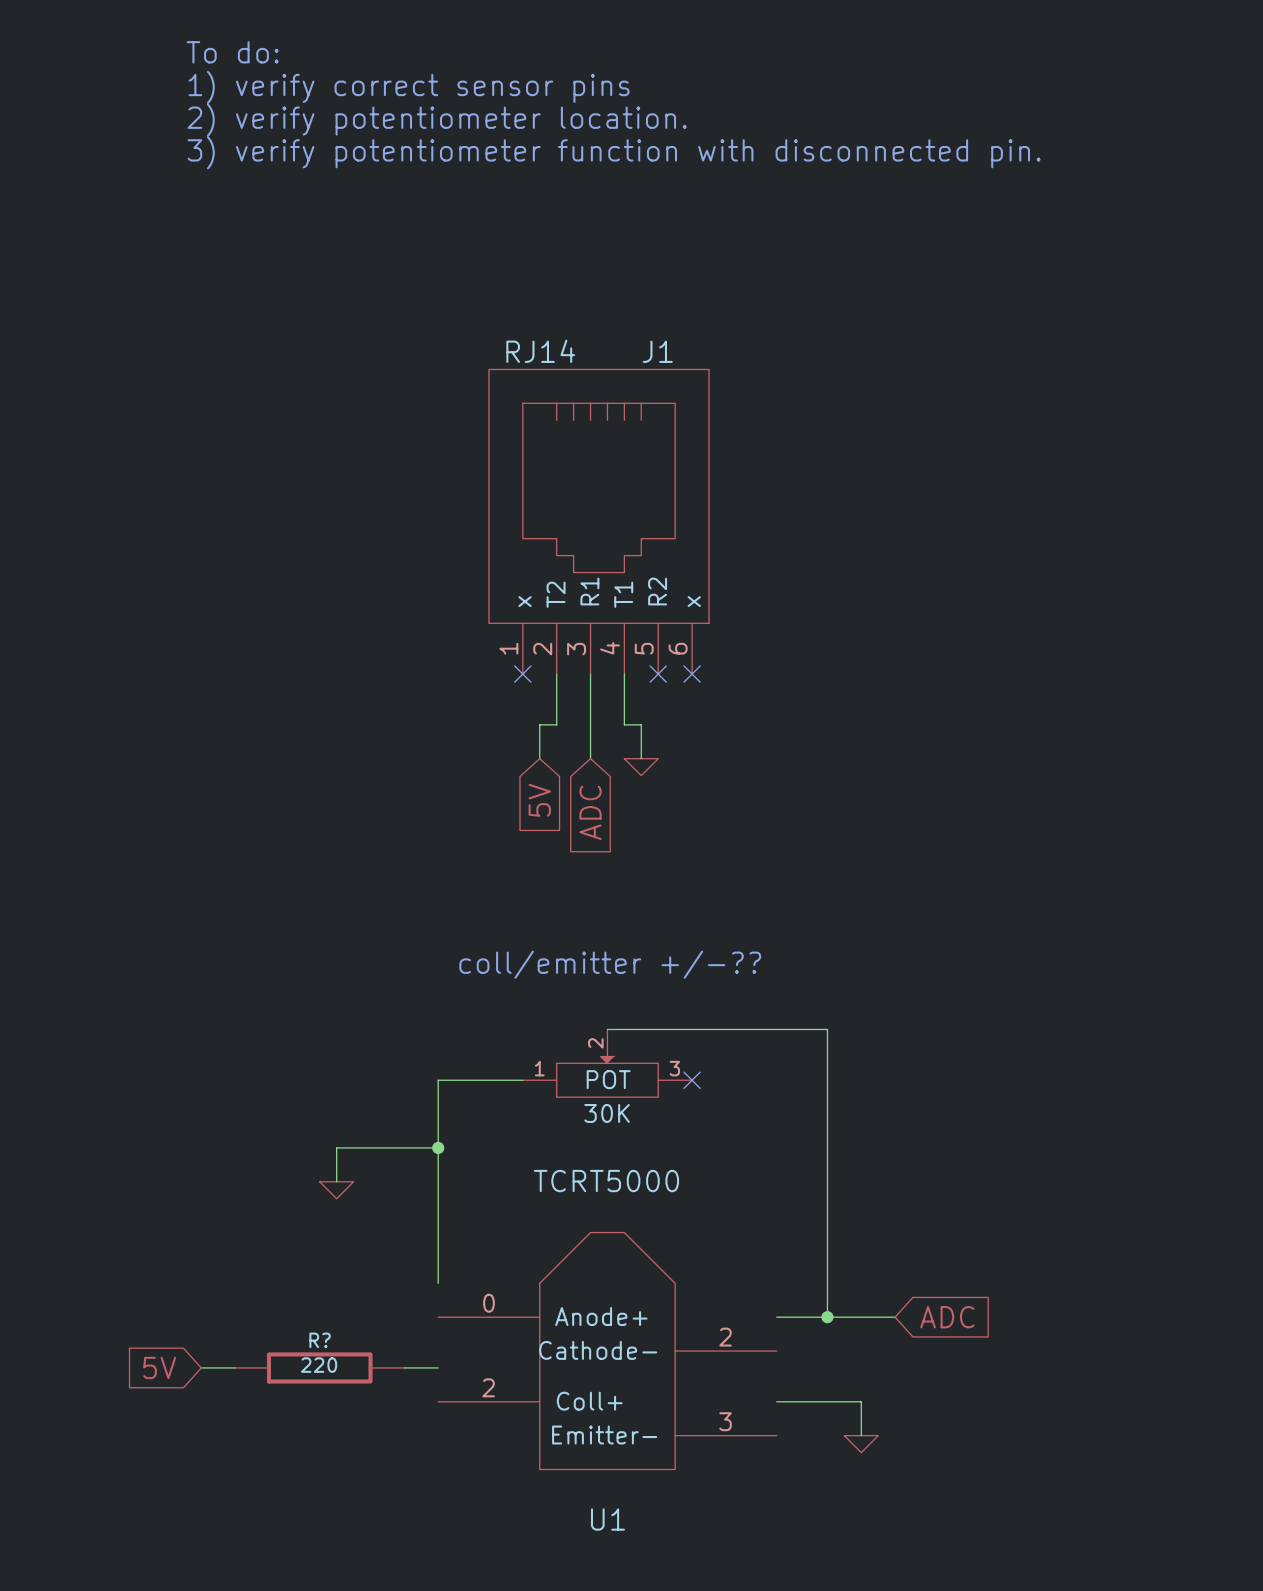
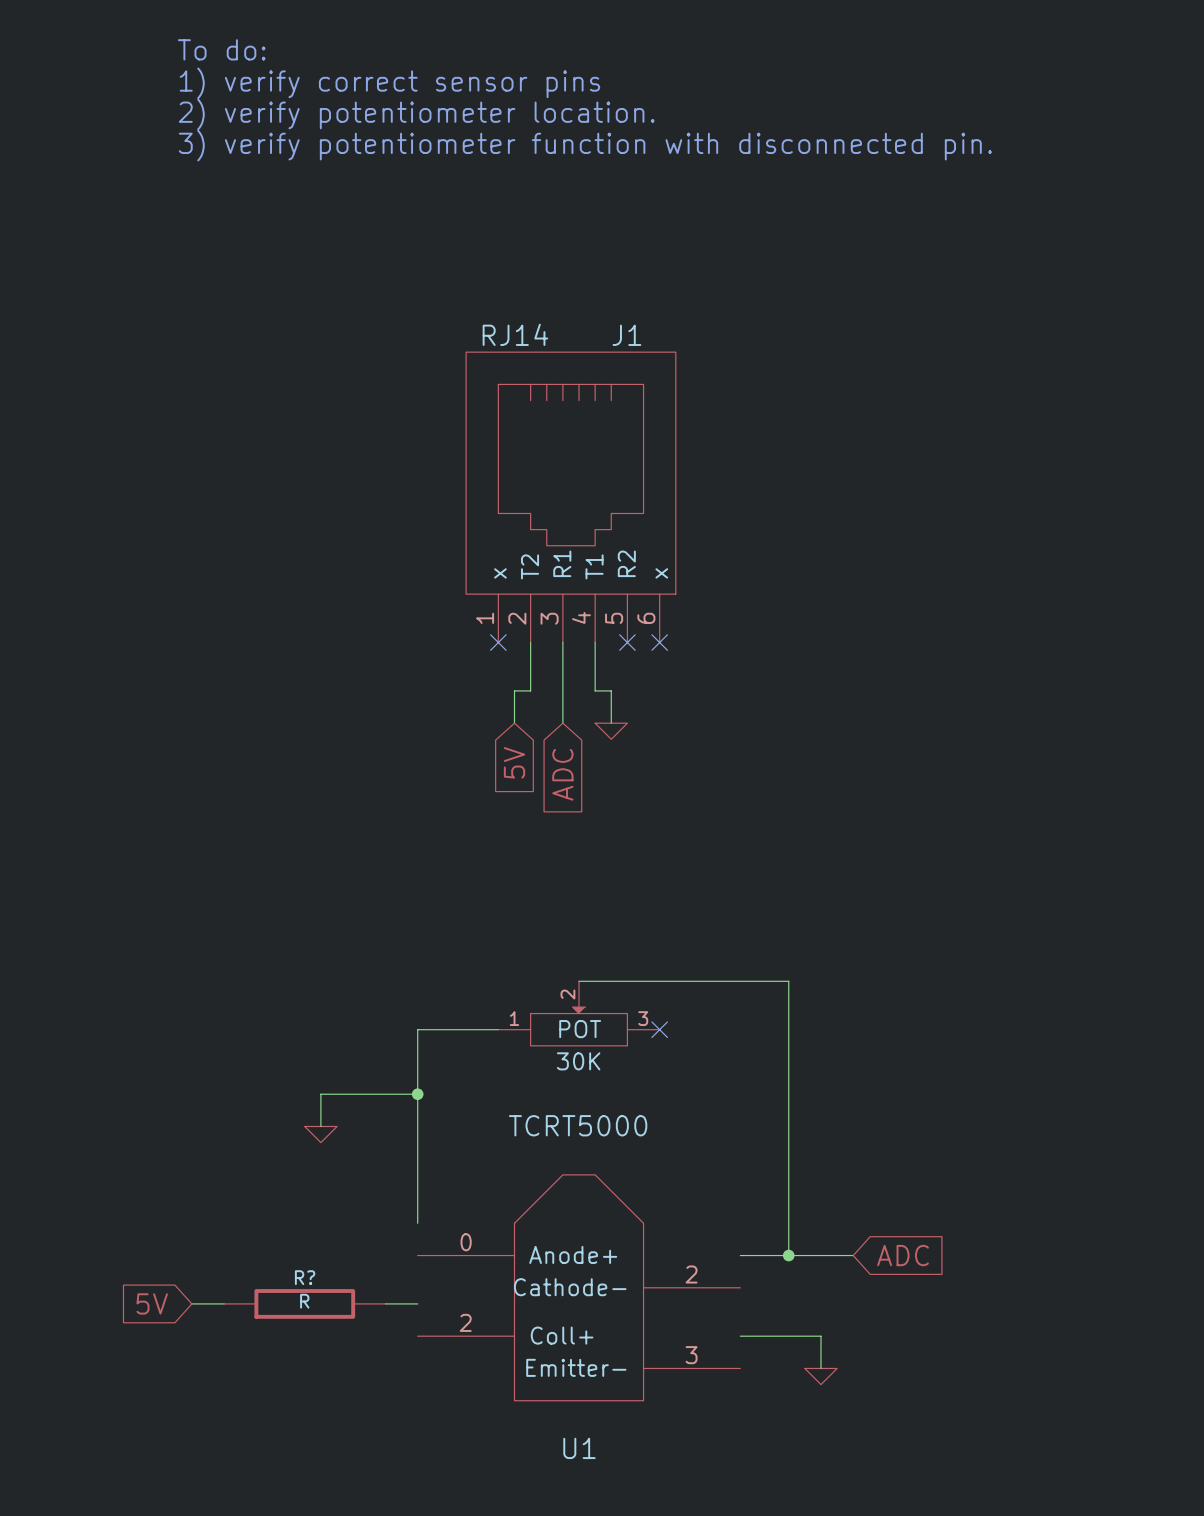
text: coll/emitter +/-?? (610, 964) -> none
R? value: 220 (319, 1365) -> R (304, 1301)

